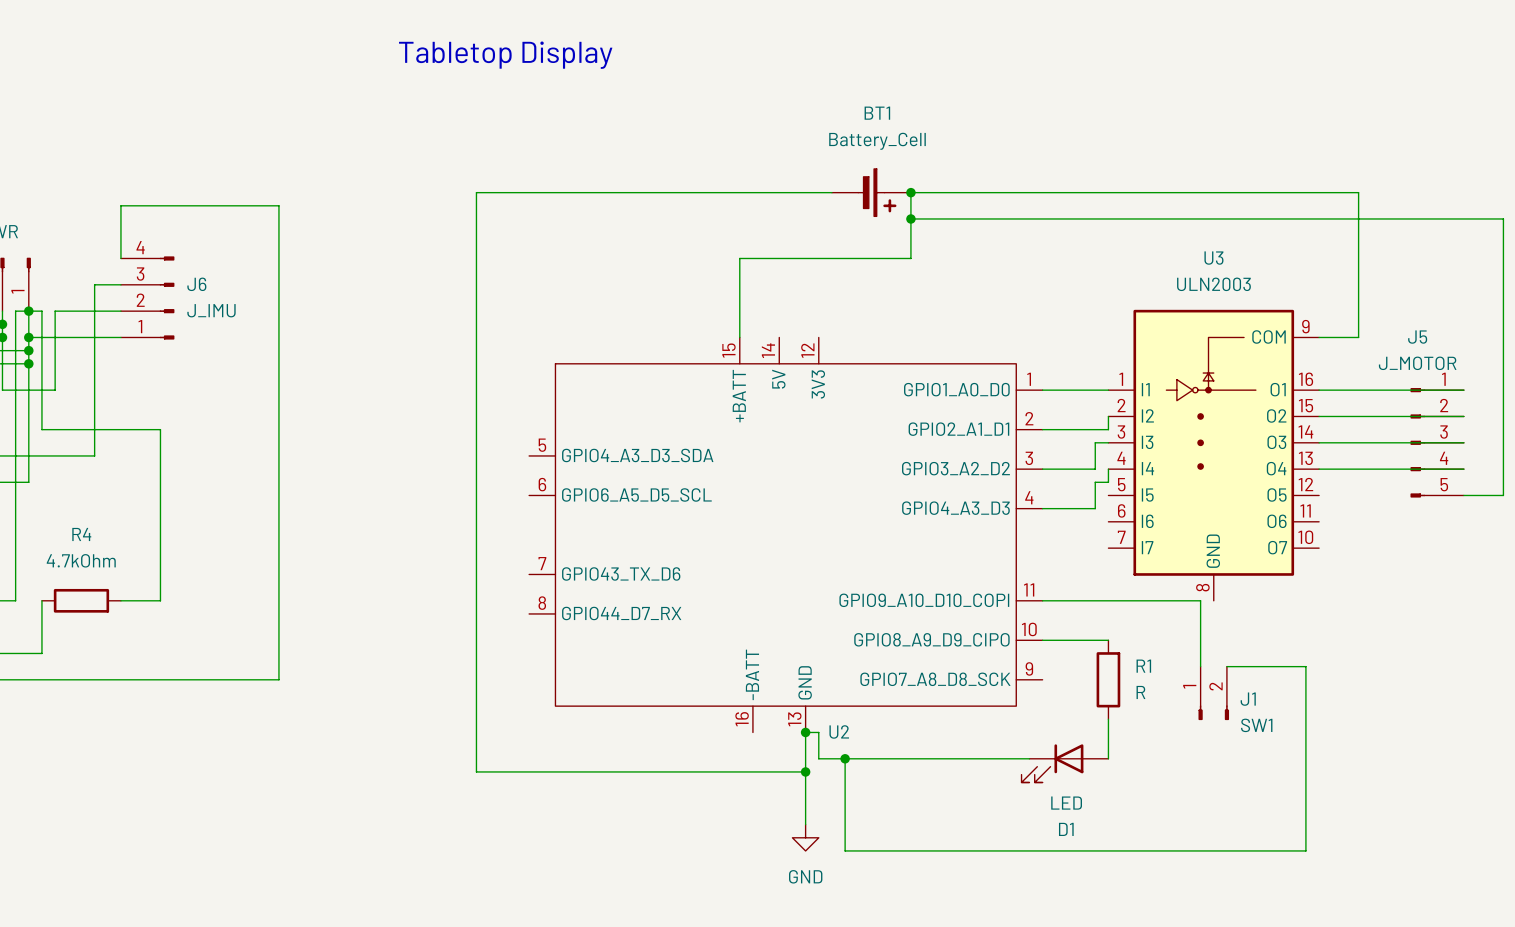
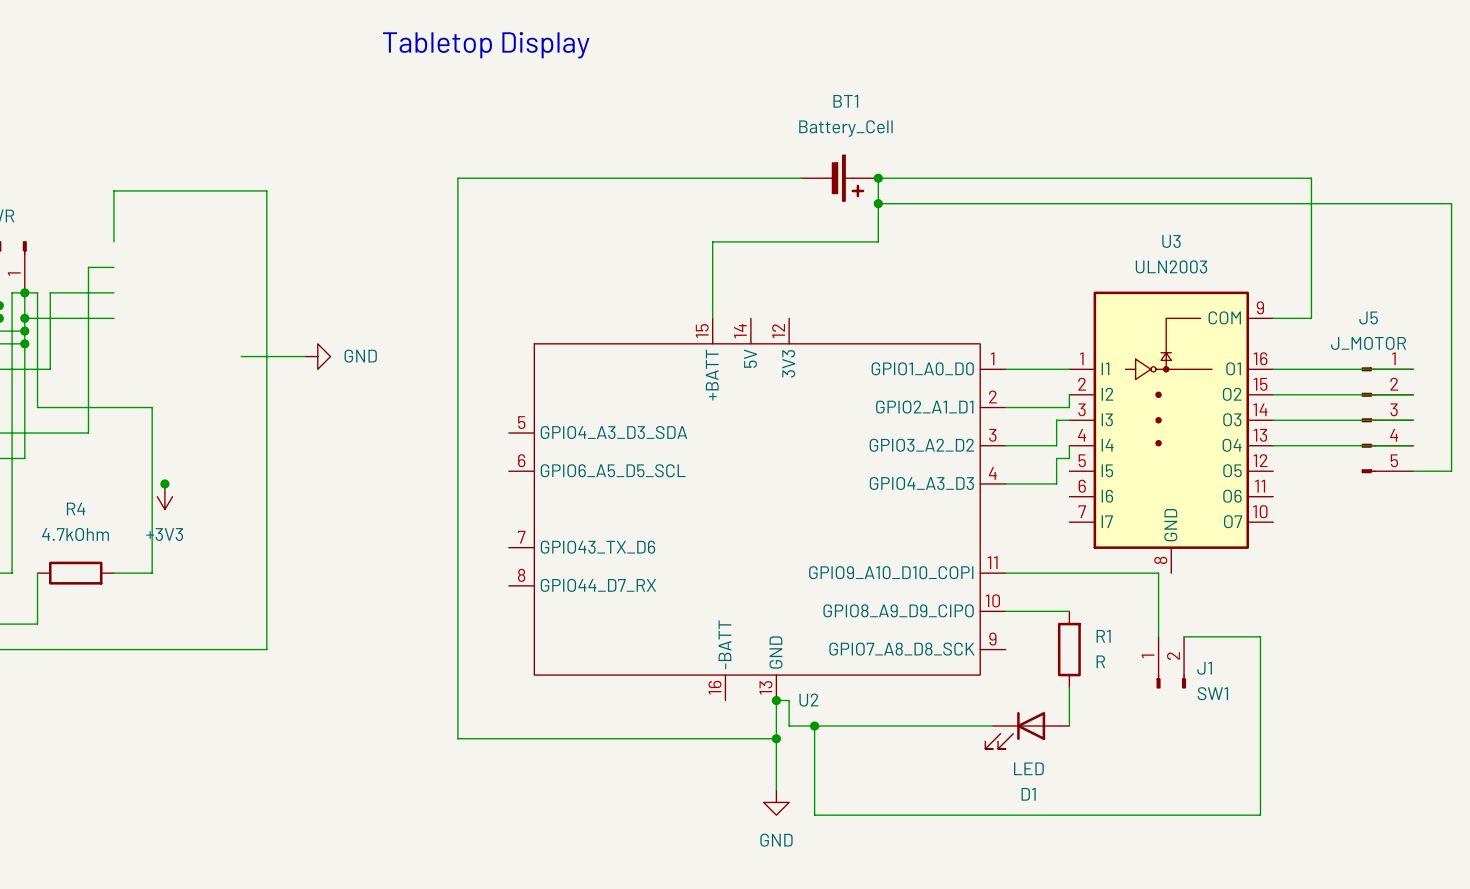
J6: J_IMU (147, 297) -> none
wire: none -> (241, 356) (305, 356)
power symbol: none -> GND (317, 356)
junction: none -> (164, 483)
power symbol: none -> +3V3 (164, 496)

